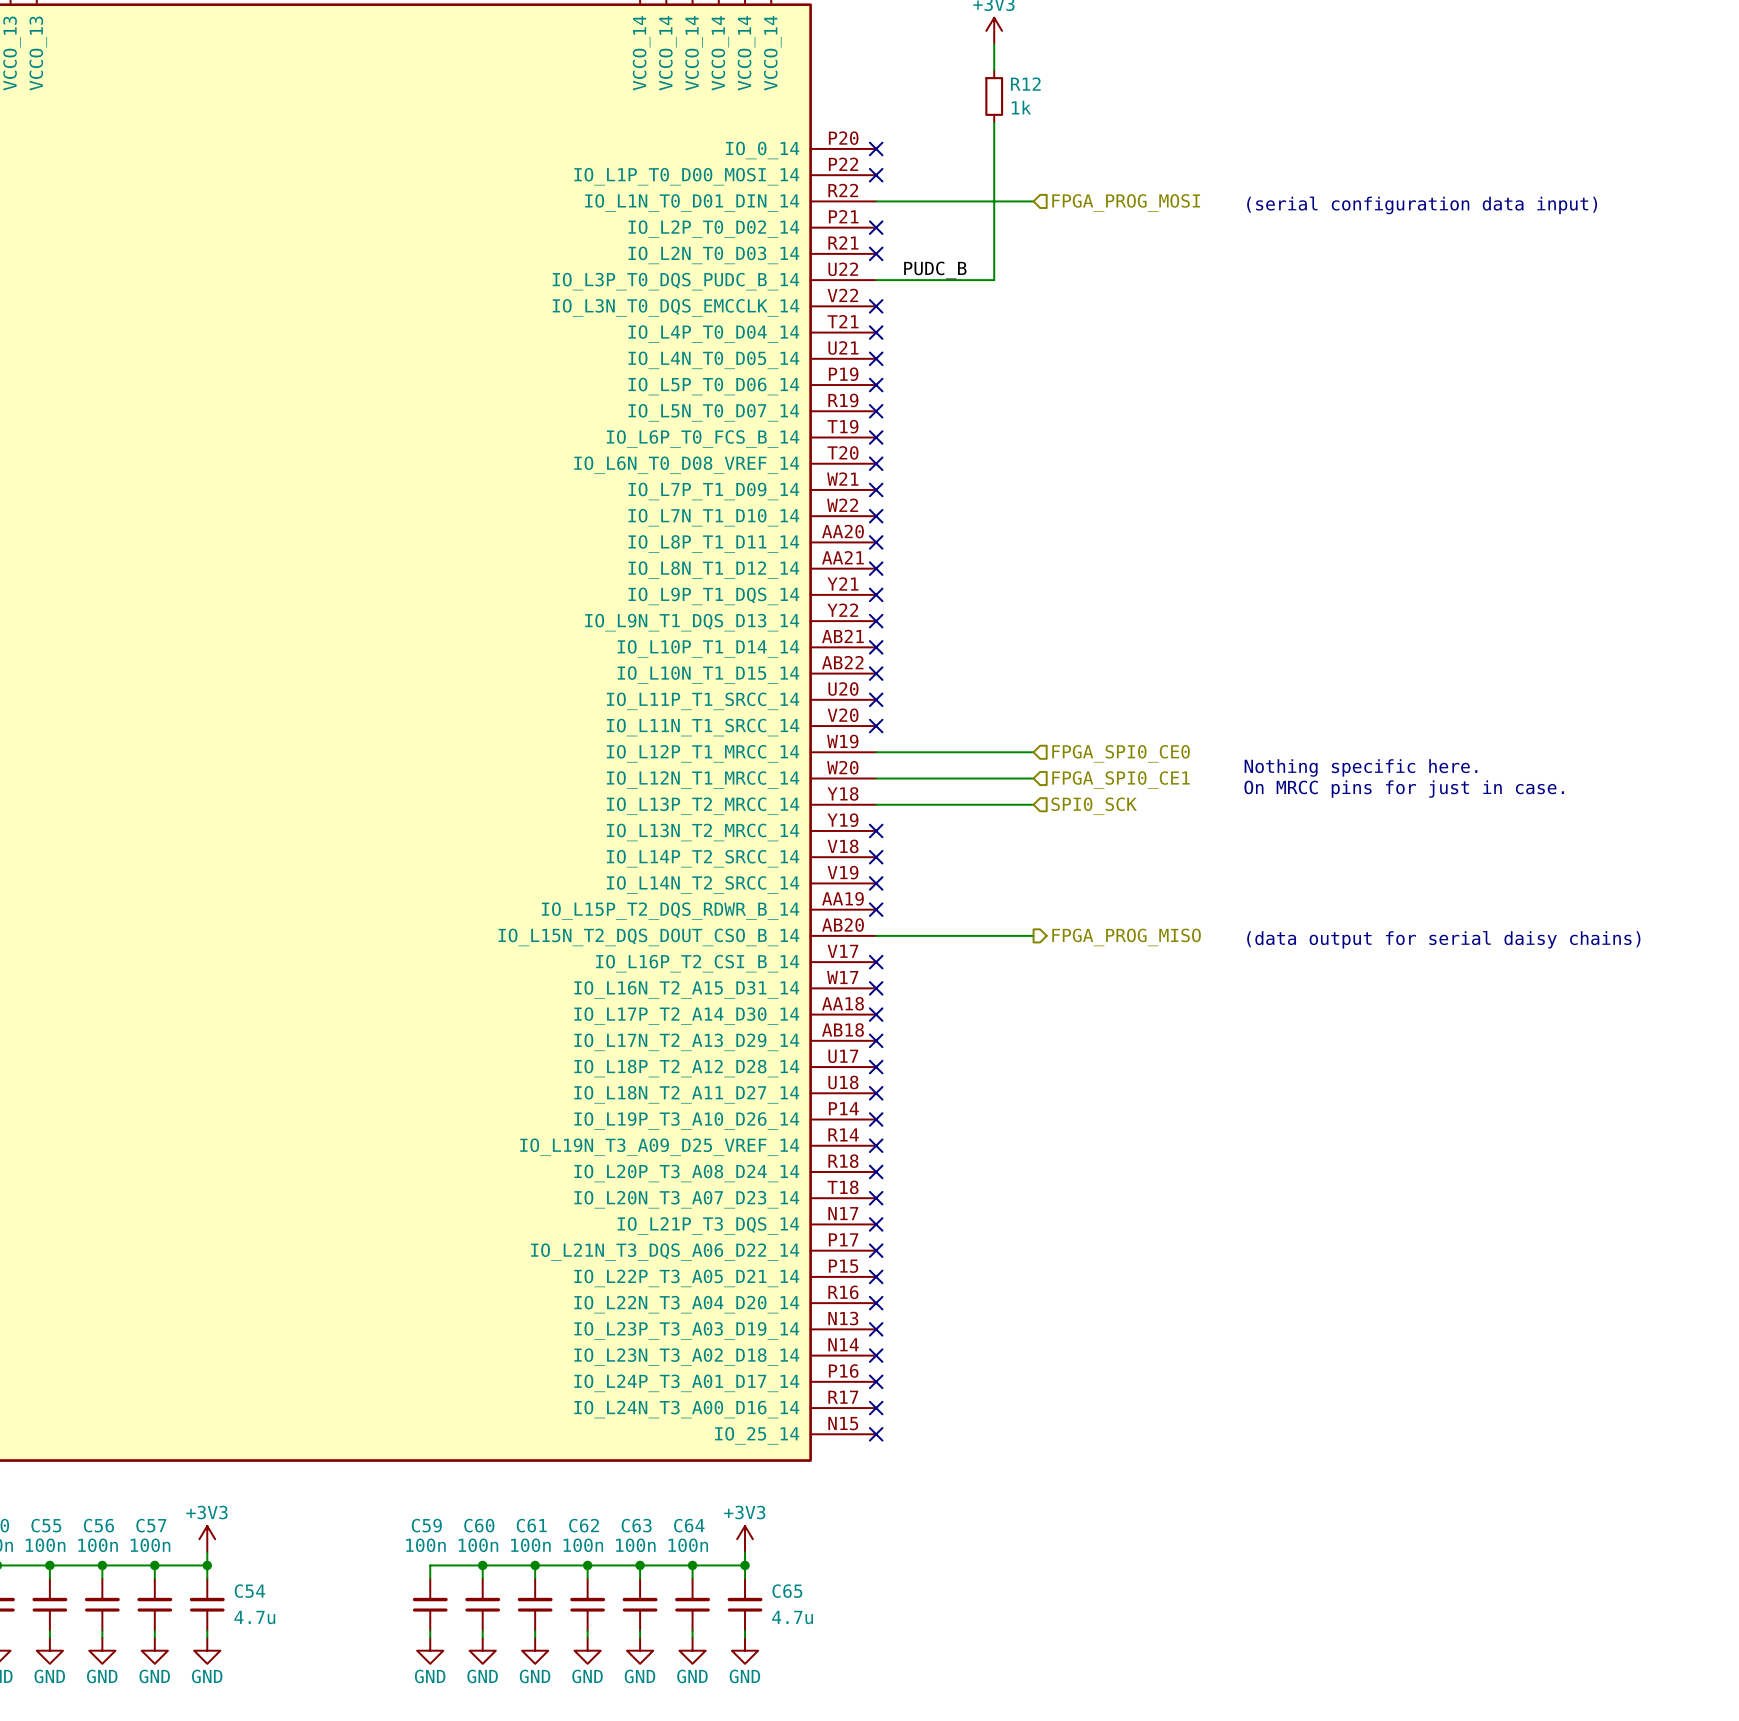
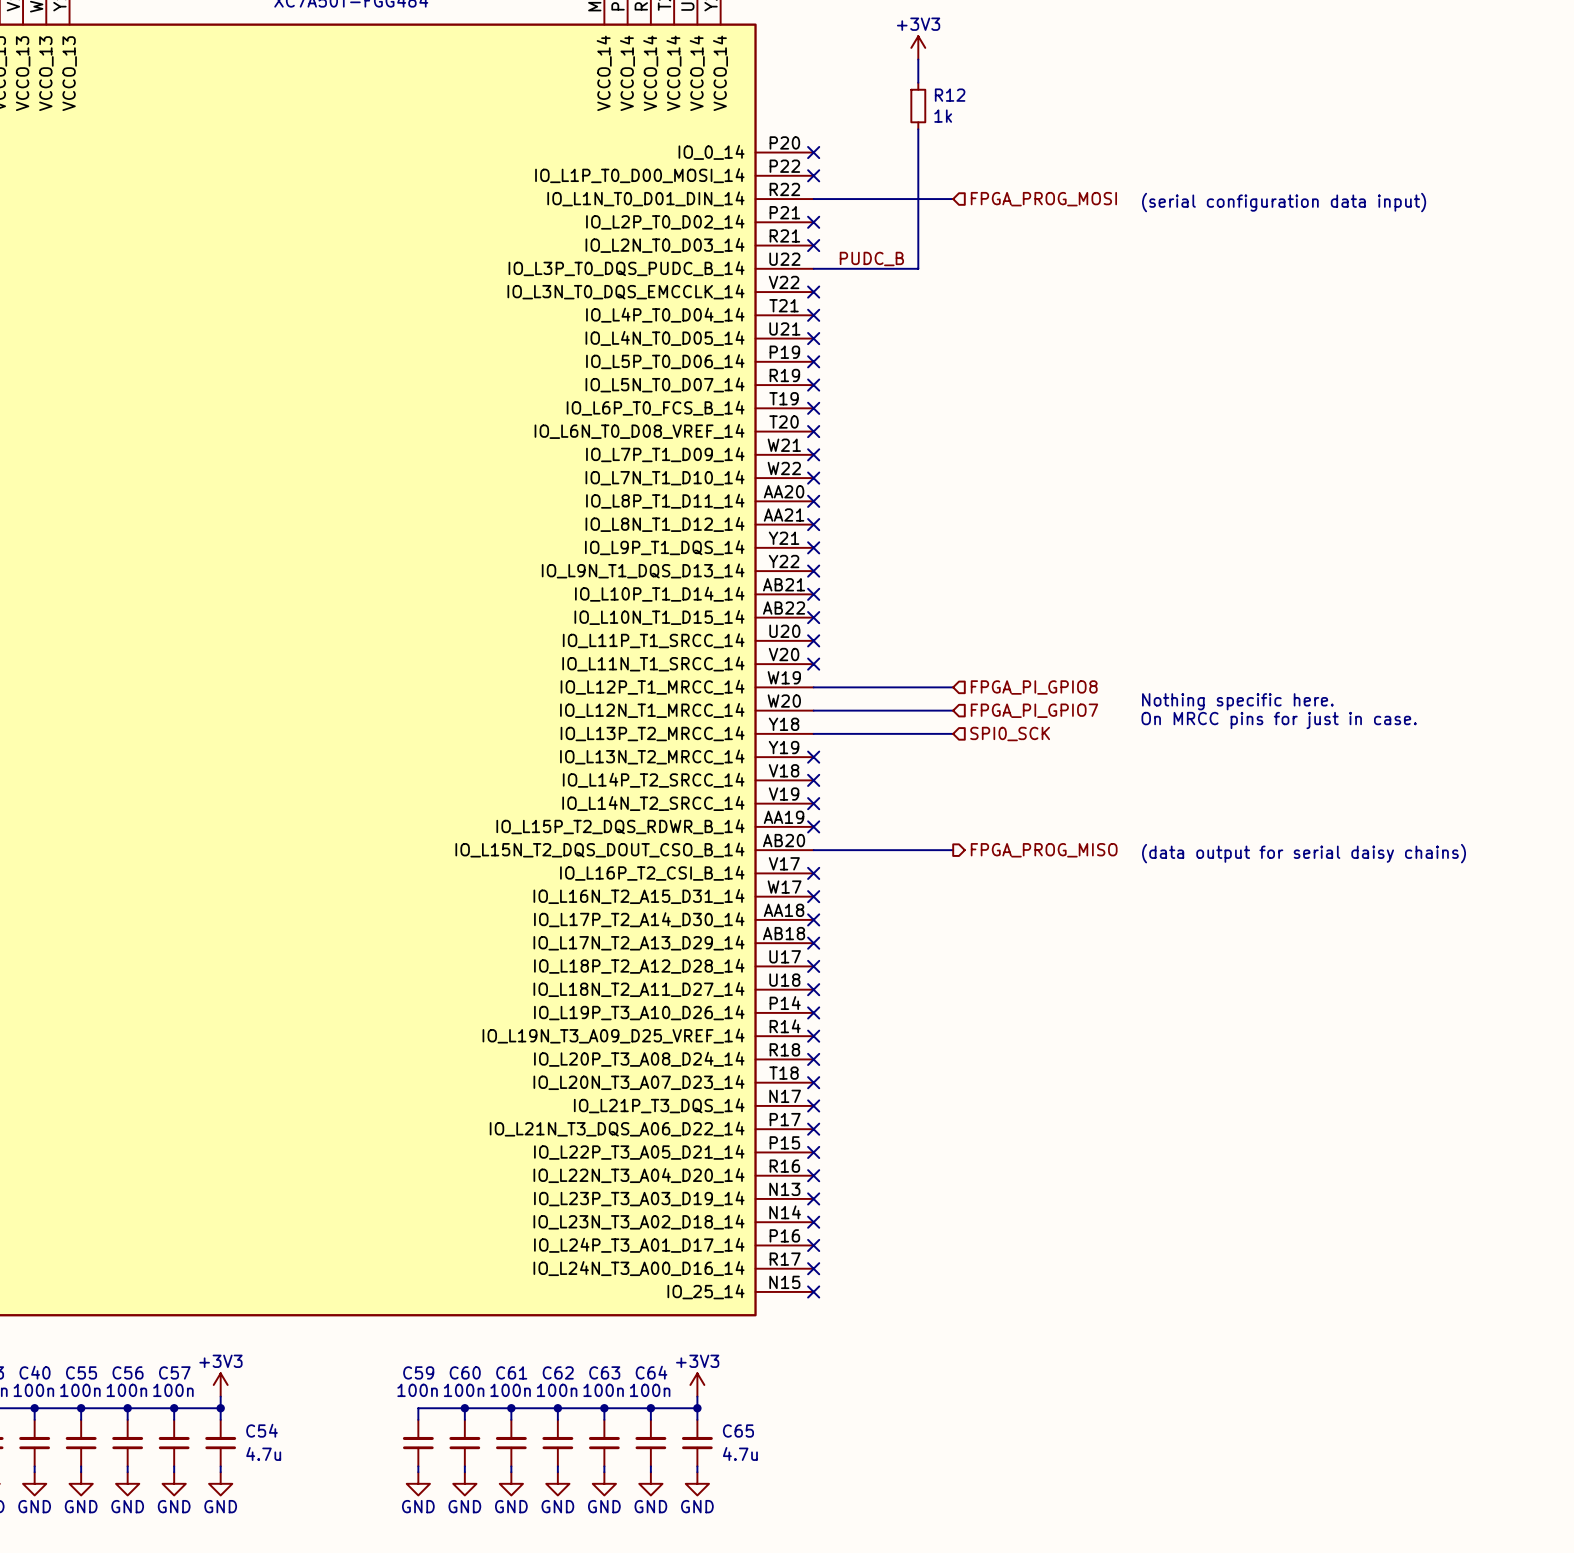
hierarchical label: FPGA_SPI0_CE0 (1121, 753) -> FPGA_PI_GPIO8 (1034, 687)
hierarchical label: FPGA_SPI0_CE1 (1121, 780) -> FPGA_PI_GPIO7 (1034, 710)

